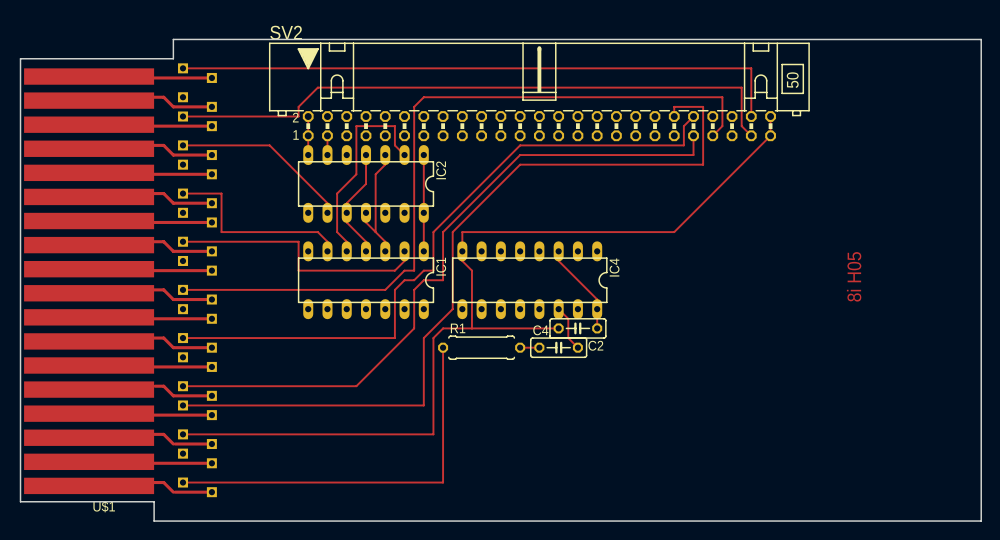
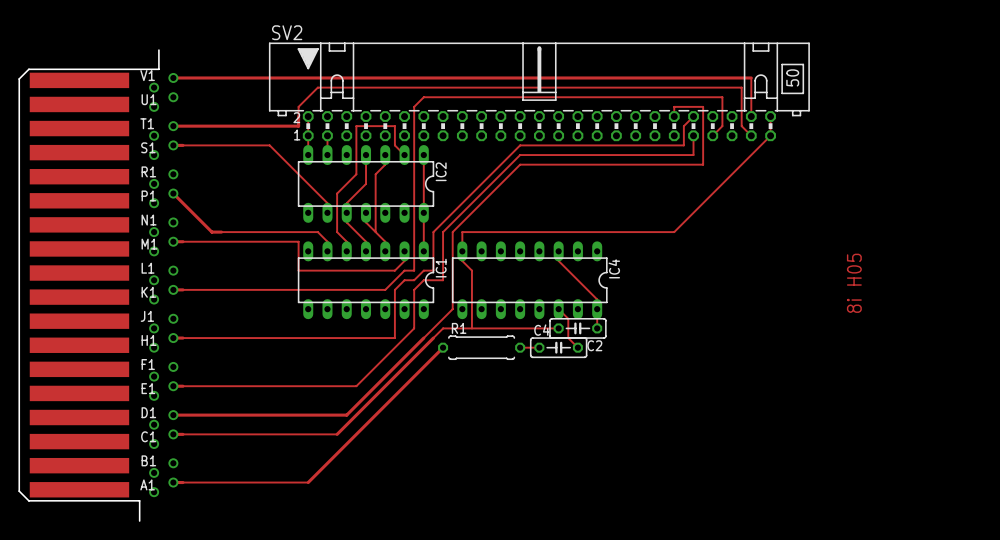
board edge: (173, 39) (981, 39) (981, 521) (154, 521) (154, 501) (20, 501) (20, 58) (173, 58) (173, 39) -> none
track: (183, 68) (751, 68) (751, 77) -> (173, 77) (751, 77)
track: (183, 116) (298, 116) -> (173, 126) (298, 126) (298, 116)
track: none -> (173, 145) (183, 145)
track: (183, 193) (221, 193) (221, 232) -> (173, 193) (211, 232) (221, 232)
track: none -> (173, 241) (183, 241)
U$1: (120, 280) -> none
part: none -> (89, 285)
part: none -> (163, 285)
track: none -> (173, 289) (183, 289)
track: none -> (173, 338) (183, 338)
track: (423, 338) (423, 405) (183, 405) -> (423, 338) (346, 415) (173, 415)
track: (433, 338) (433, 434) (337, 434) -> (433, 338) (337, 434)
track: (443, 347) (443, 482) (308, 482) -> (443, 347) (308, 482)
track: none -> (173, 386) (183, 386)
track: none -> (173, 434) (183, 434)
track: none -> (173, 482) (183, 482)

